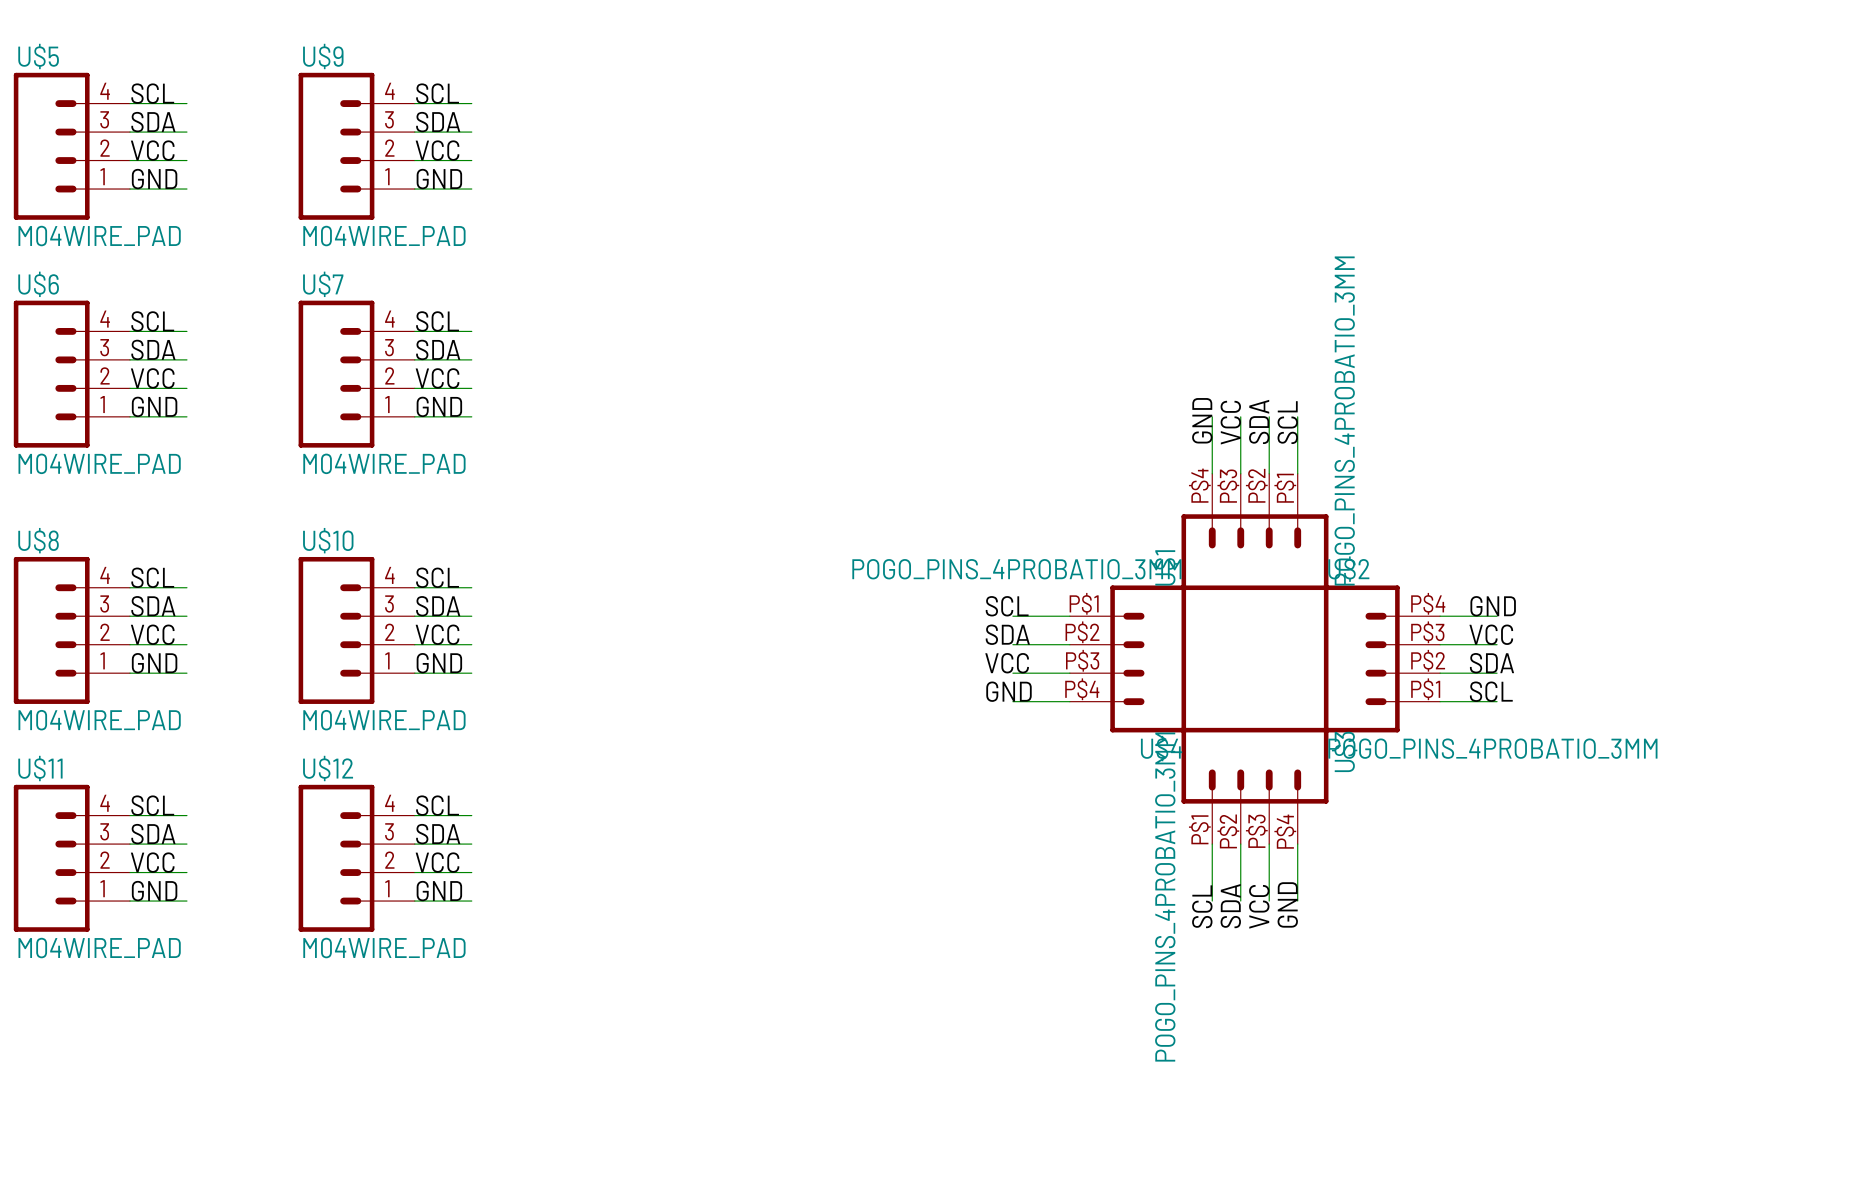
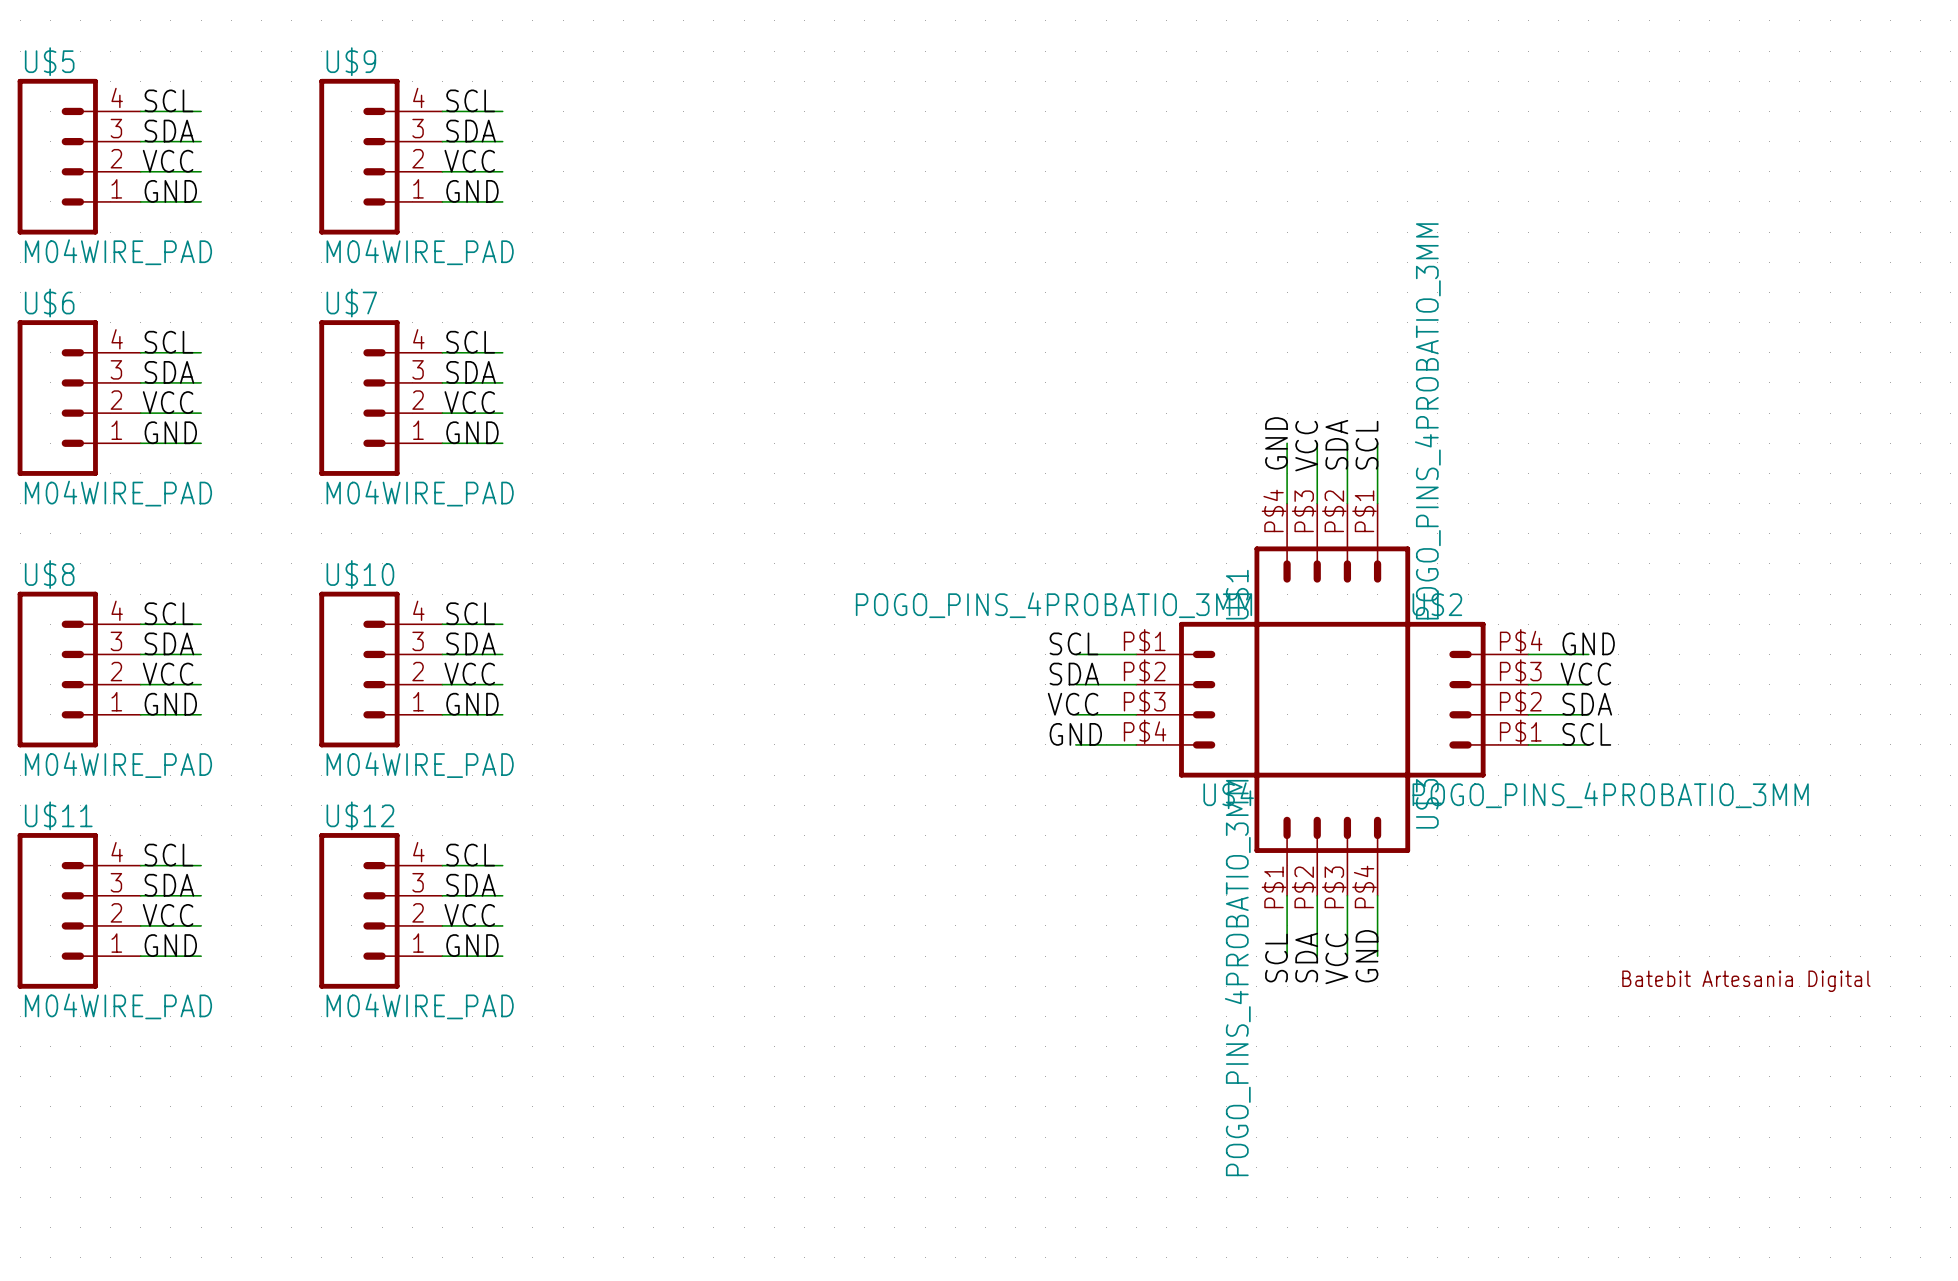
part: none -> (1746, 981)

